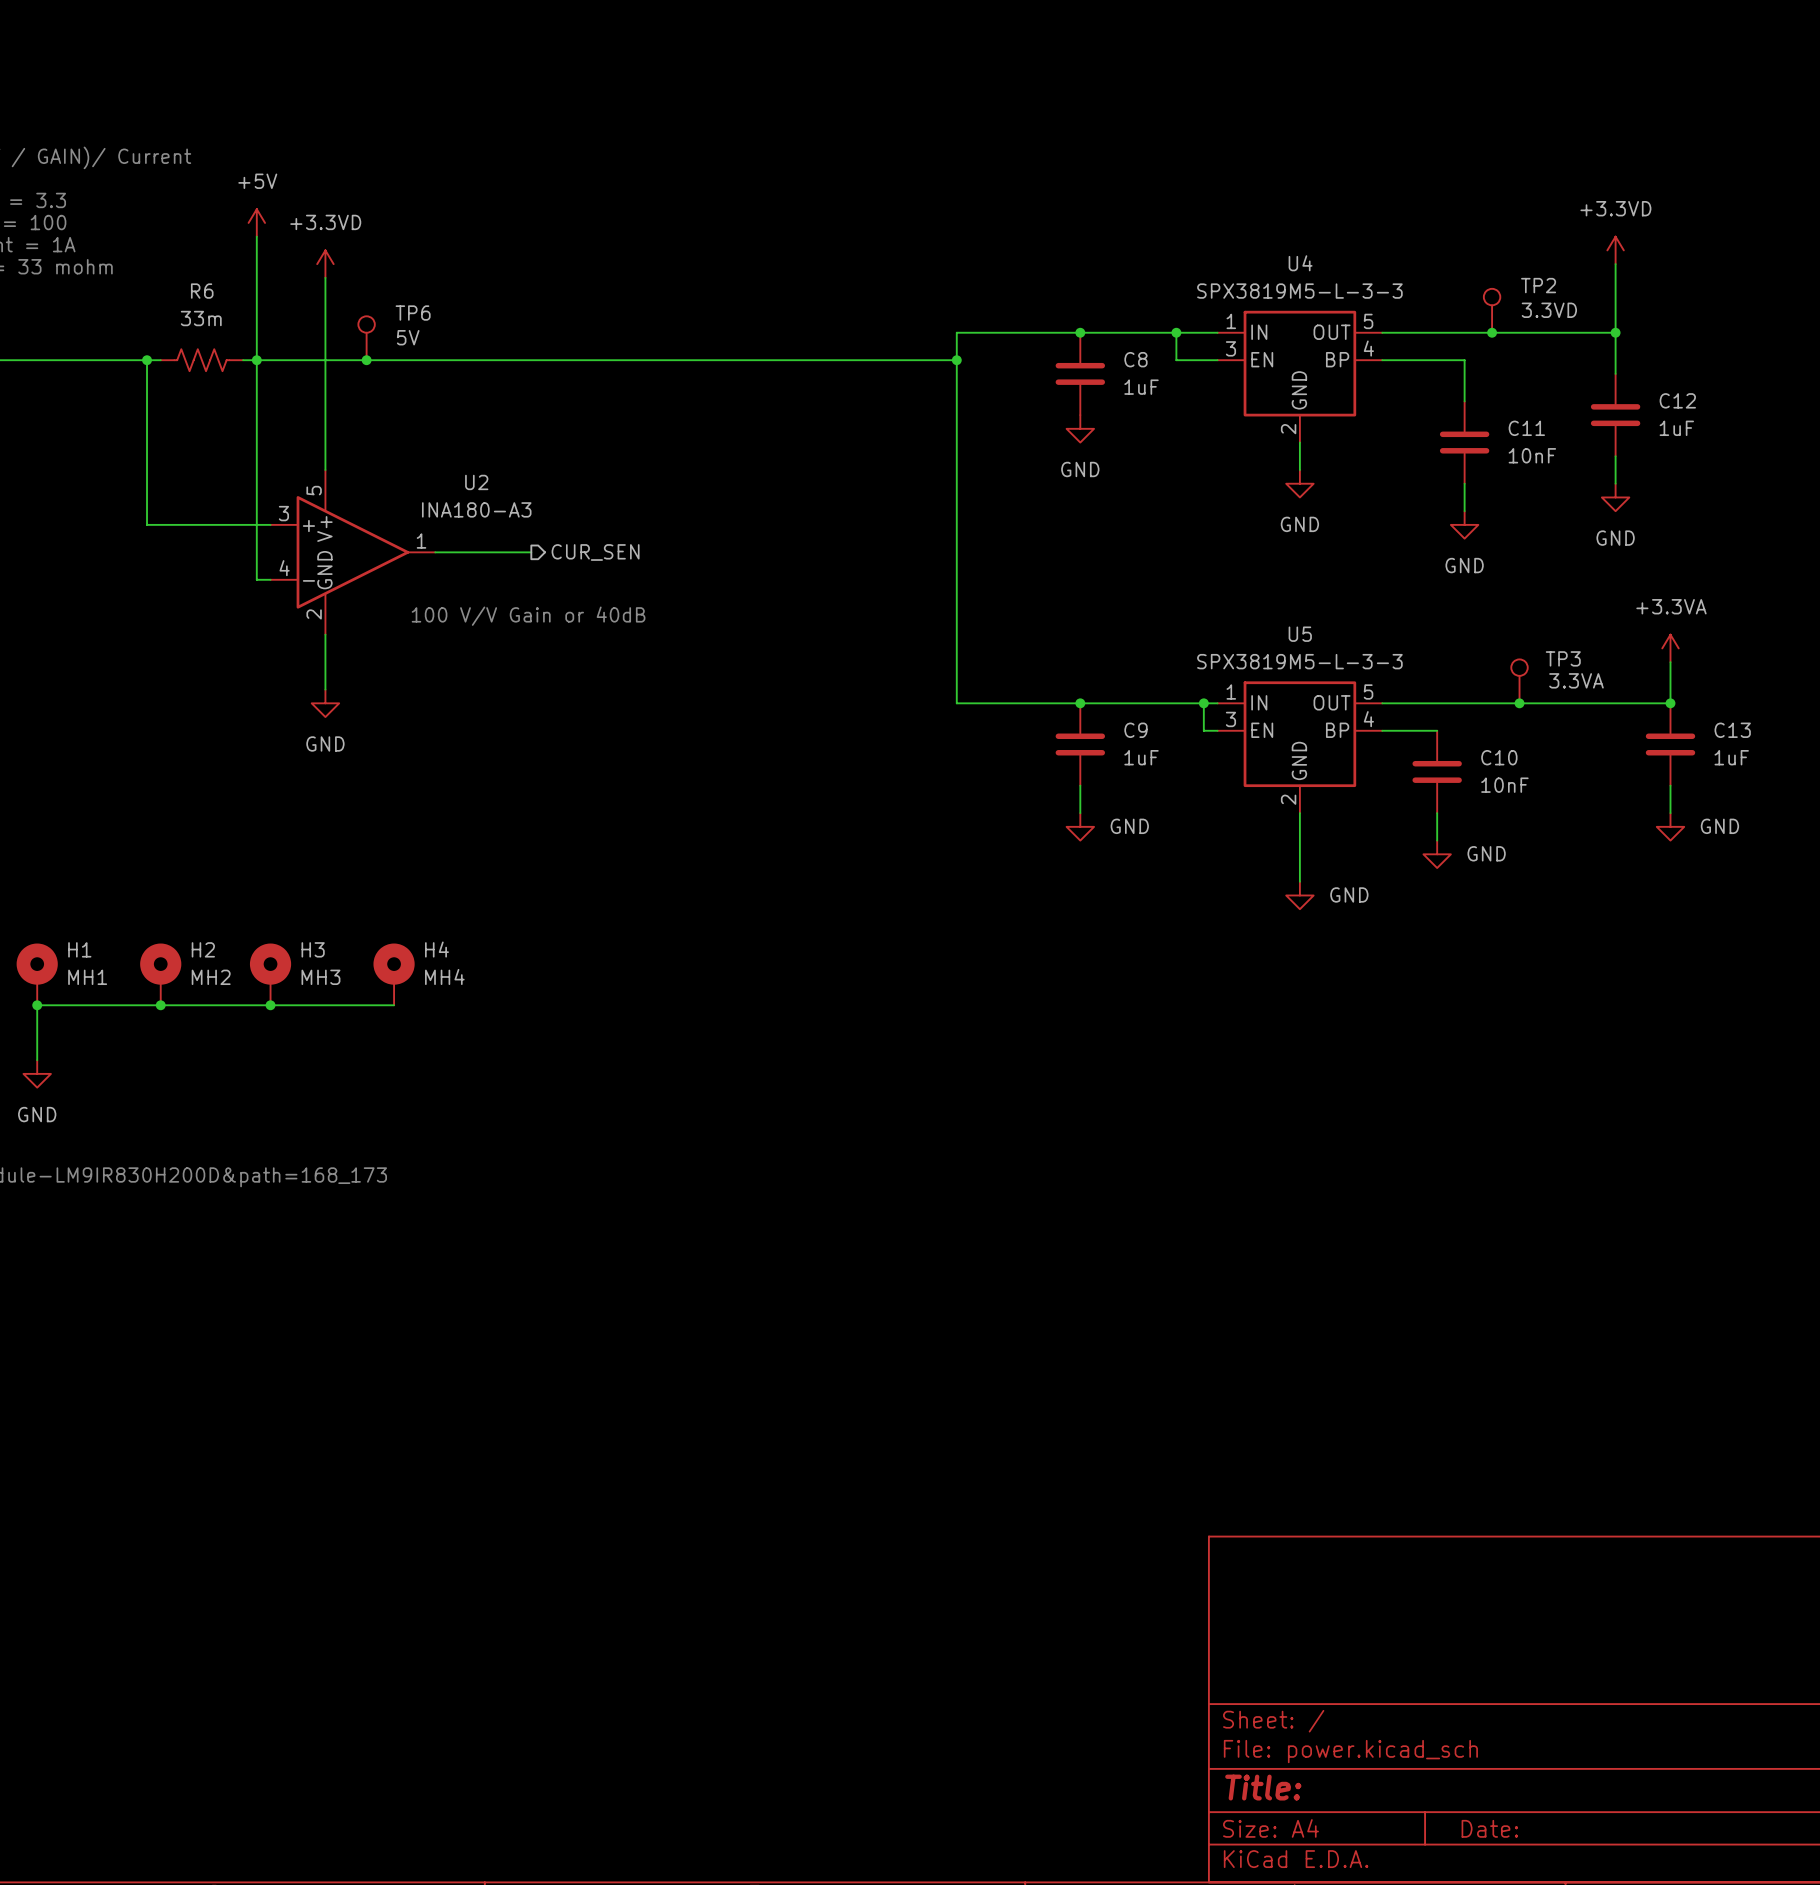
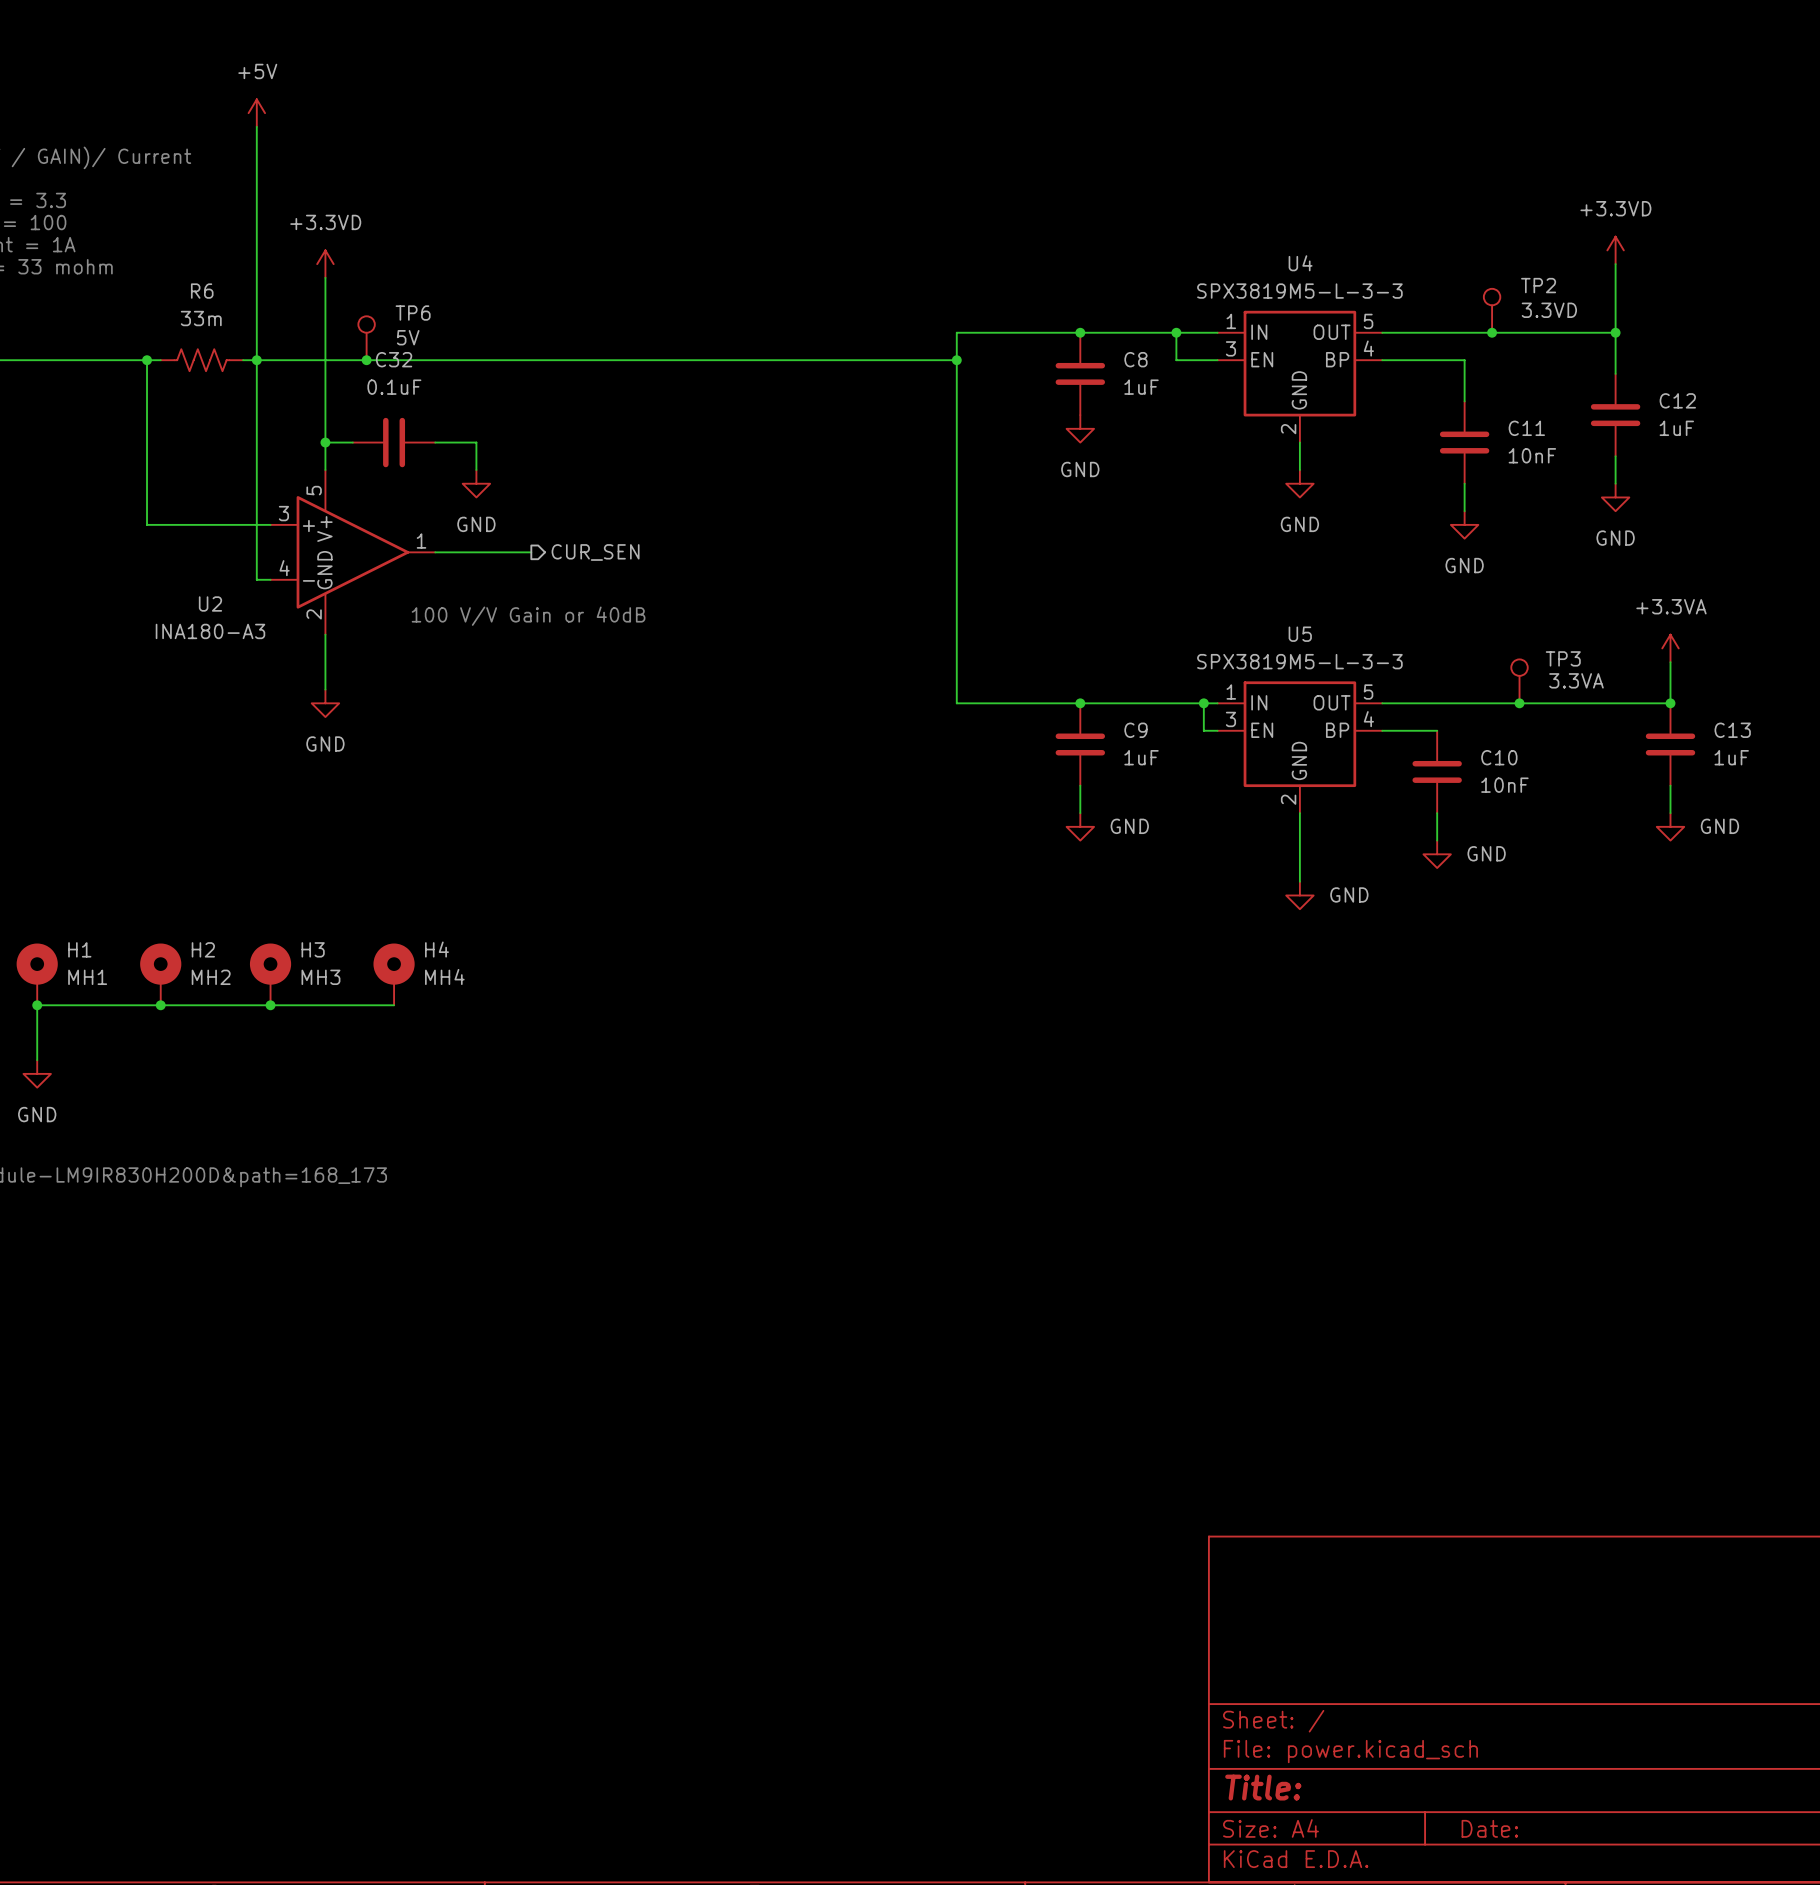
wire: none -> (256, 126) (256, 236)
power symbol position: +5V (256, 222) -> +5V (256, 113)
wire: none -> (325, 442) (352, 442)
junction: none -> (325, 442)
C32: none -> 0.1uF (394, 442)
wire: none -> (435, 442) (476, 442) (476, 470)
U2 name position: U2 (476, 482) -> U2 (210, 603)
power symbol: none -> GND (476, 483)
U2 value position: INA180-A3 (476, 509) -> INA180-A3 (210, 631)

